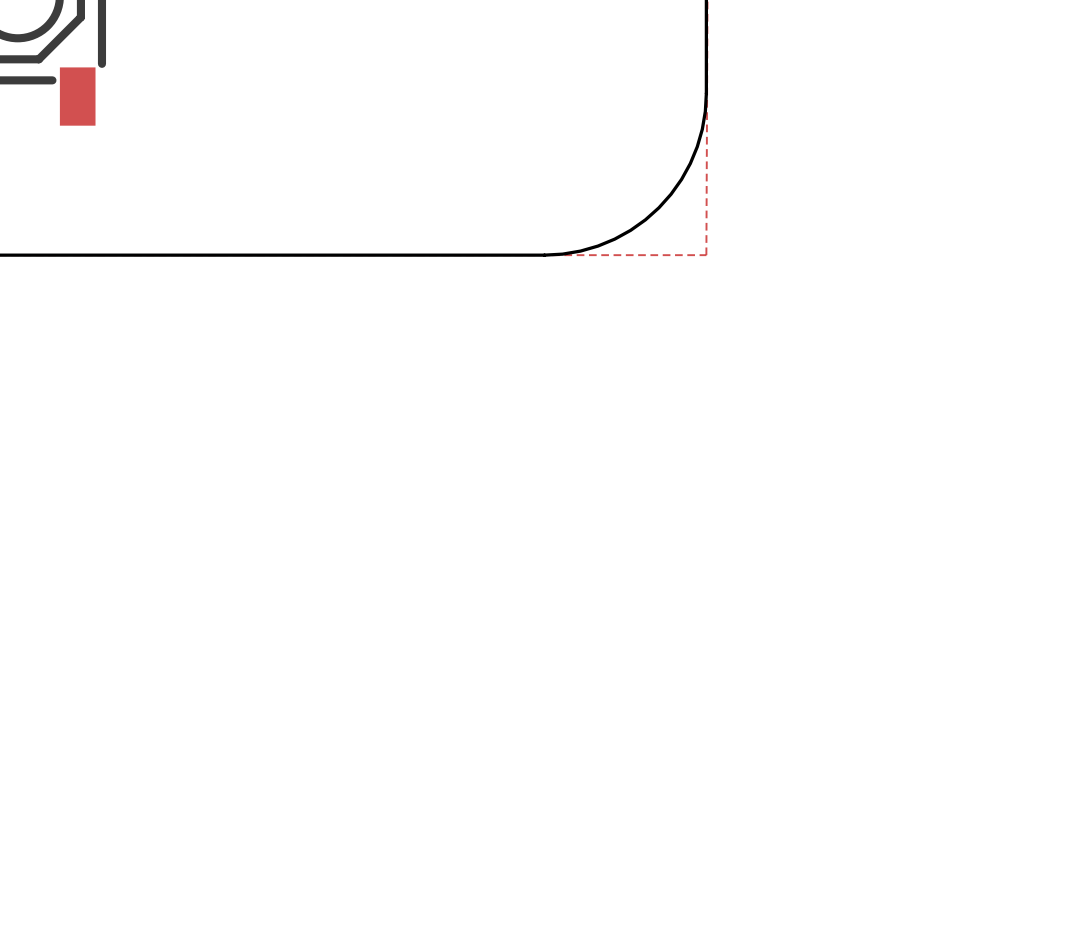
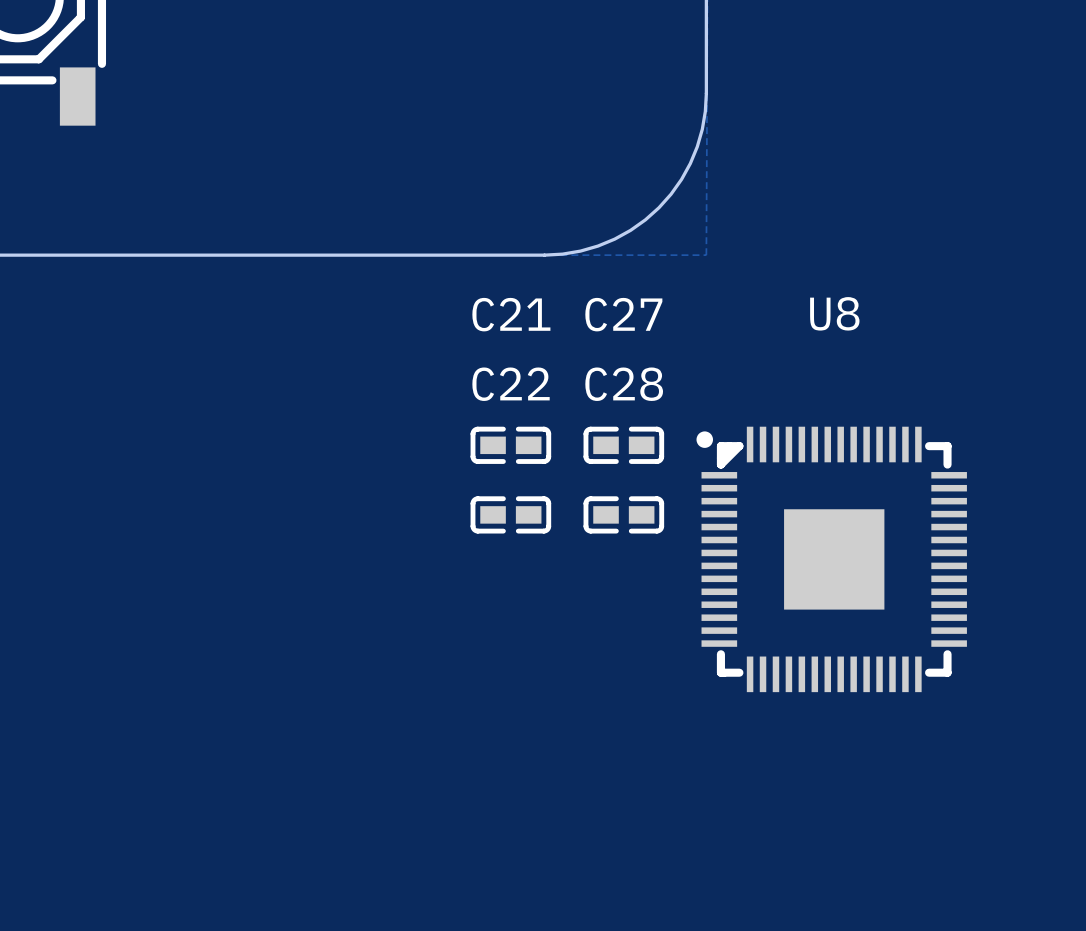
C21: none -> (510, 445)
C27: none -> (623, 445)
C22: none -> (510, 514)
C28: none -> (623, 514)
U8: none -> (831, 559)

